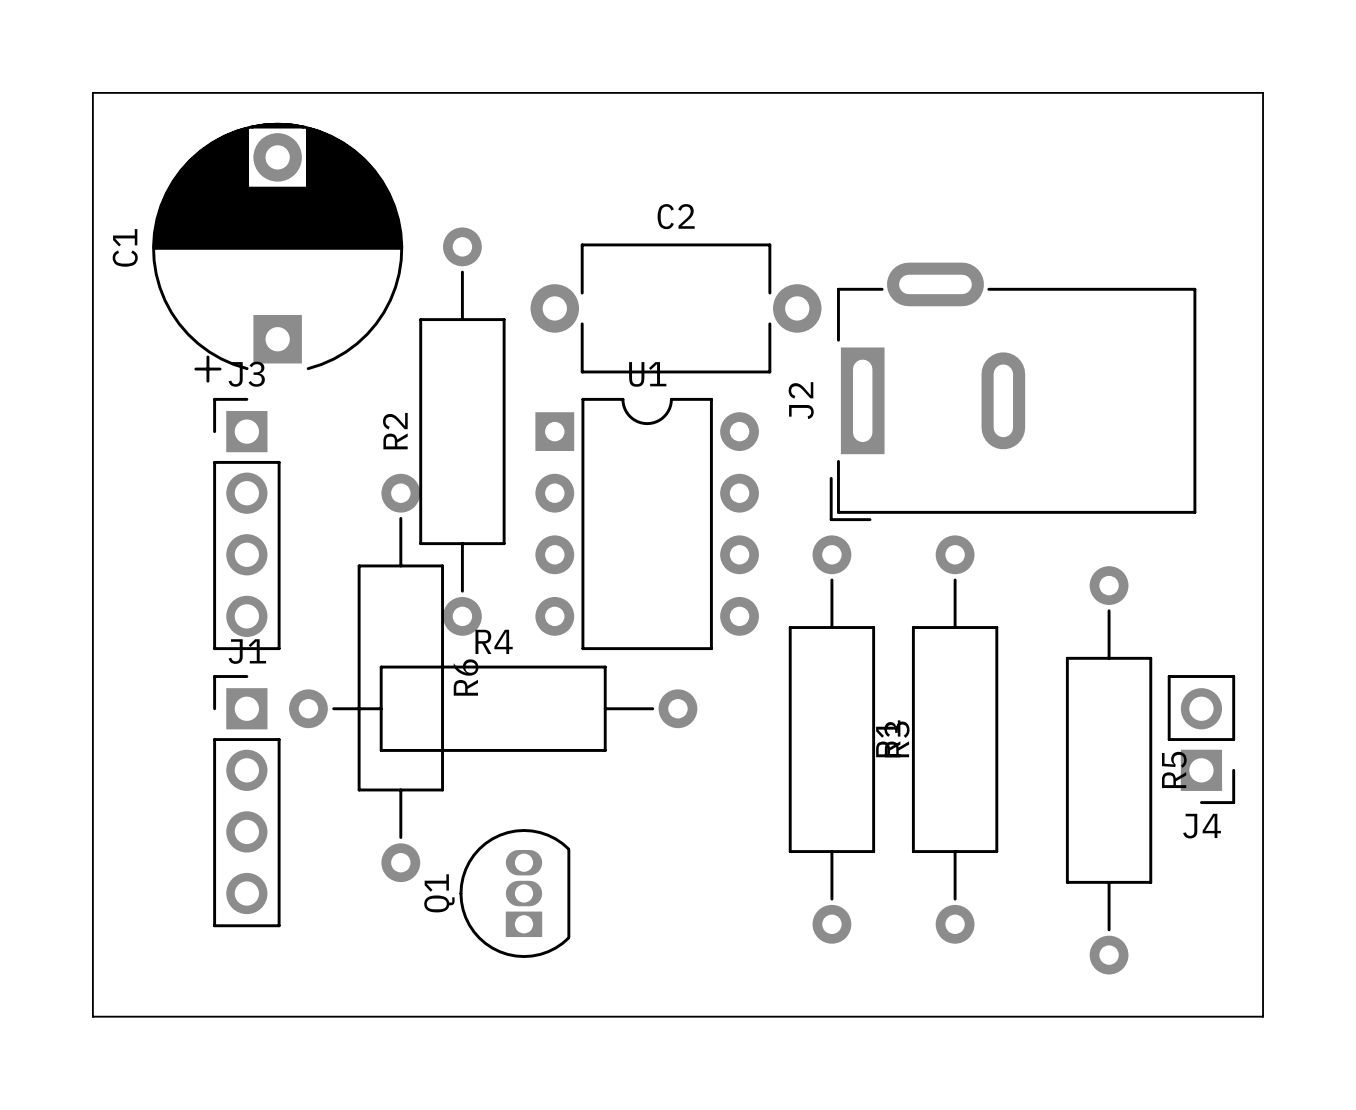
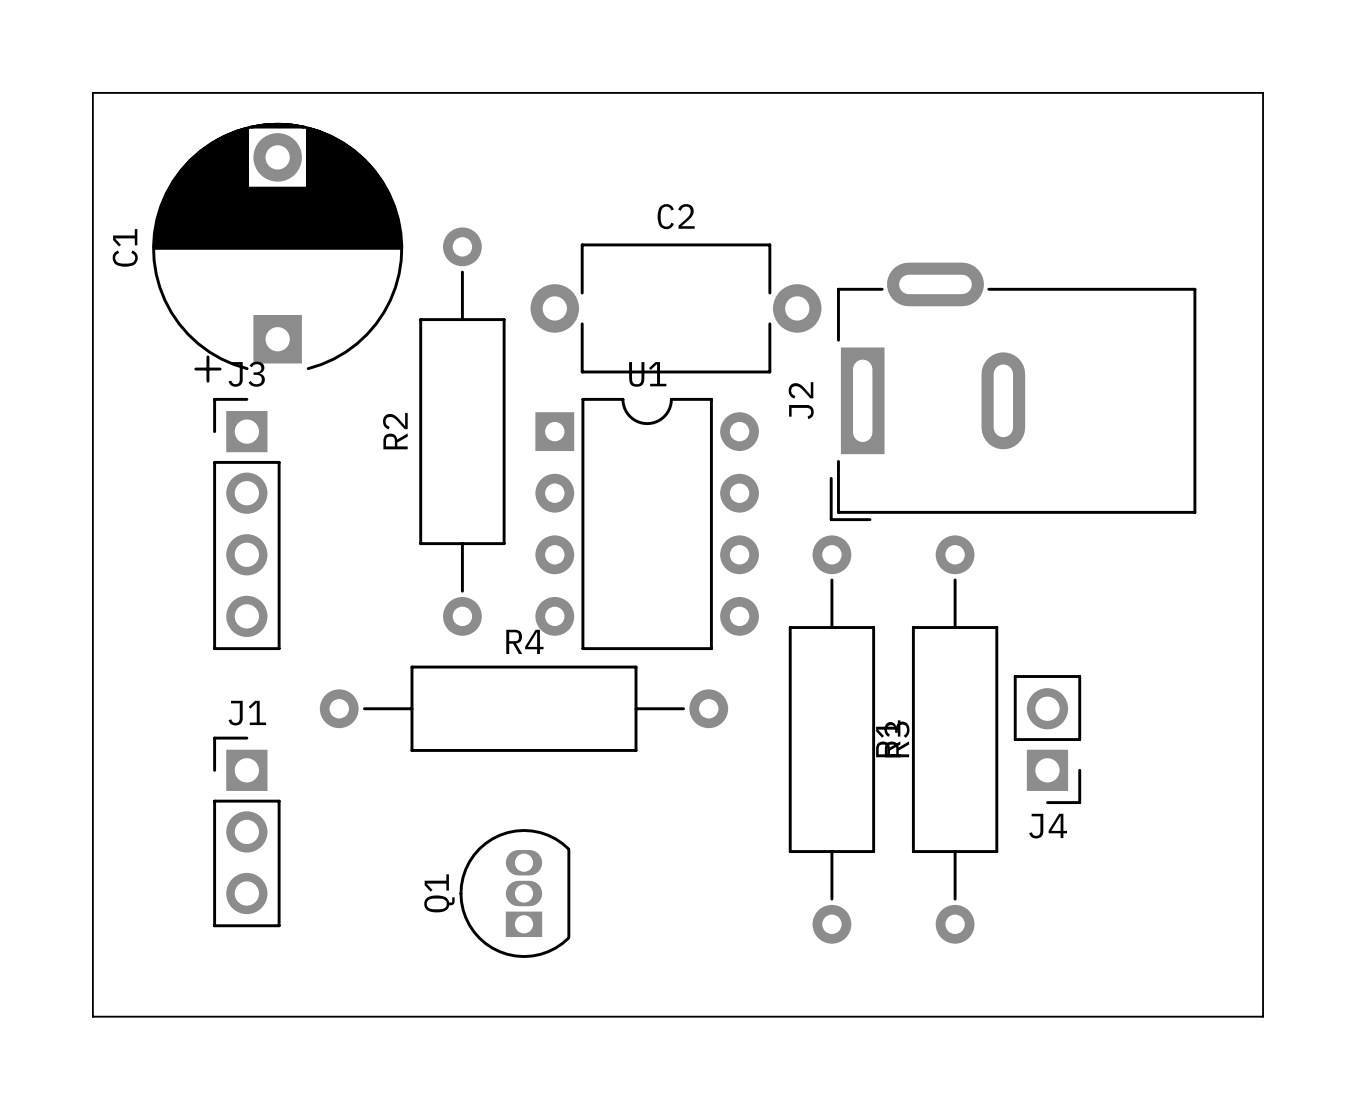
J1 footprint: [213, 675, 281, 928] -> [213, 736, 281, 928]
R6: (400, 677) -> none
R4 position: (493, 708) -> (523, 708)
J4 position: (1201, 739) -> (1047, 739)
R5: (1109, 770) -> none

